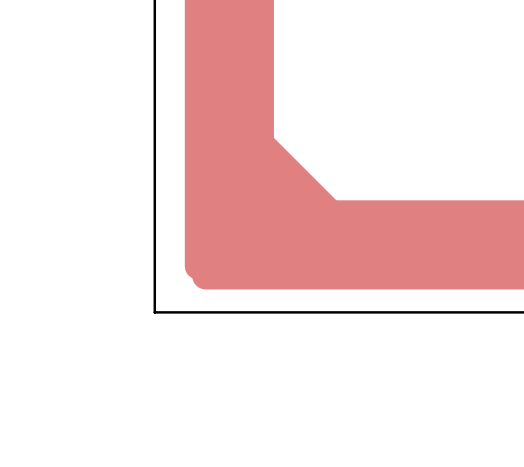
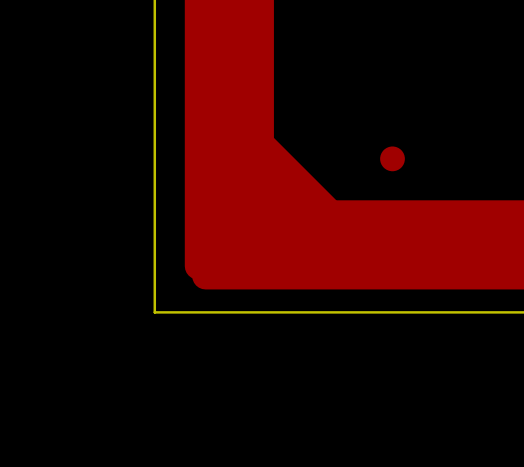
part: none -> (392, 158)

